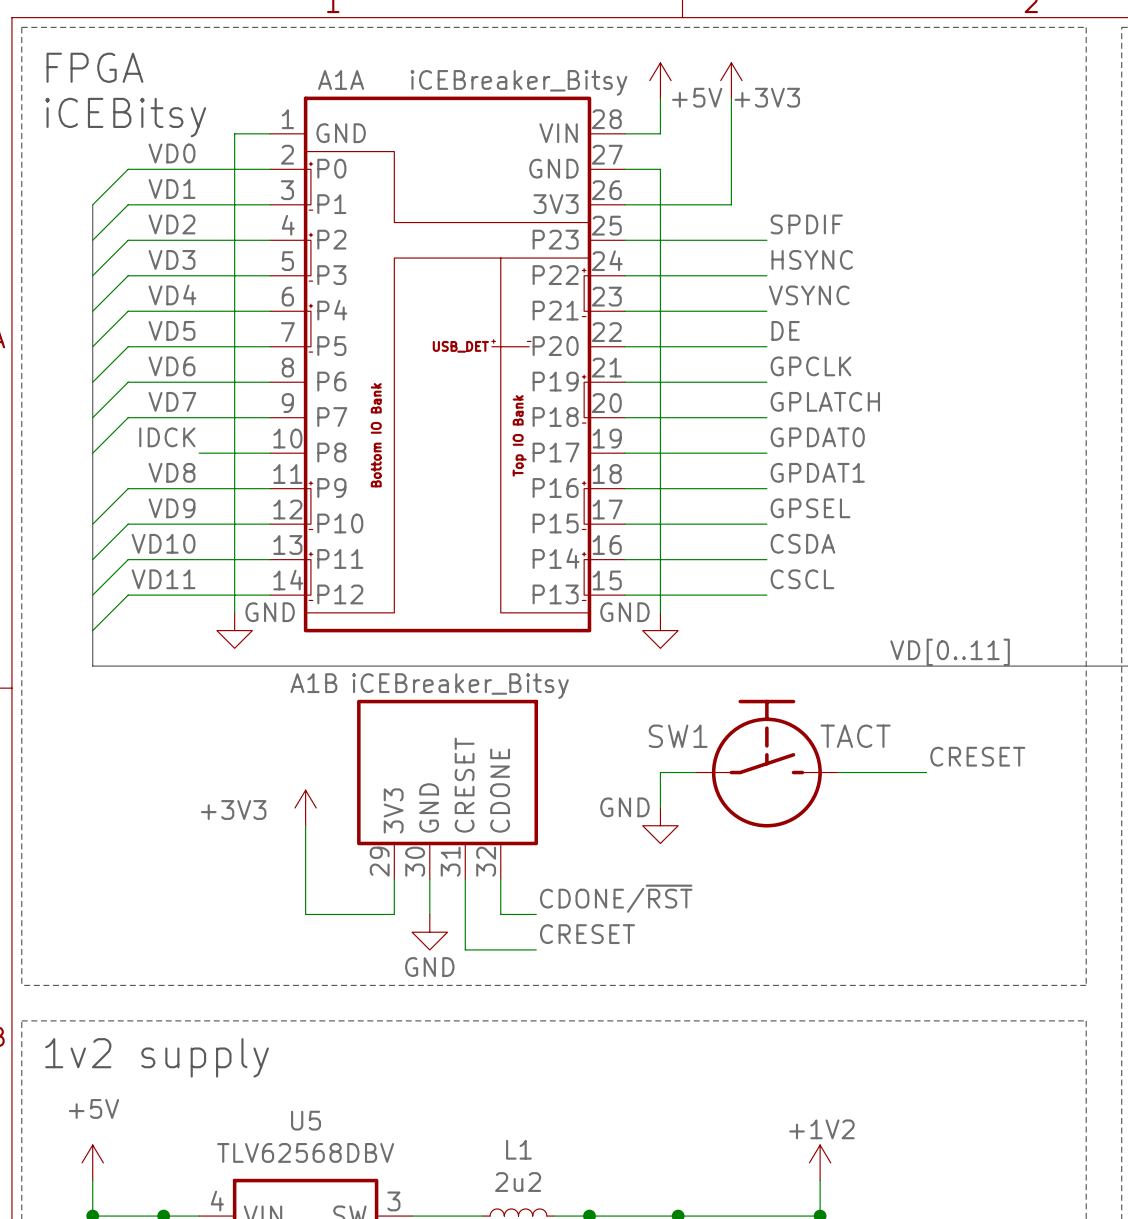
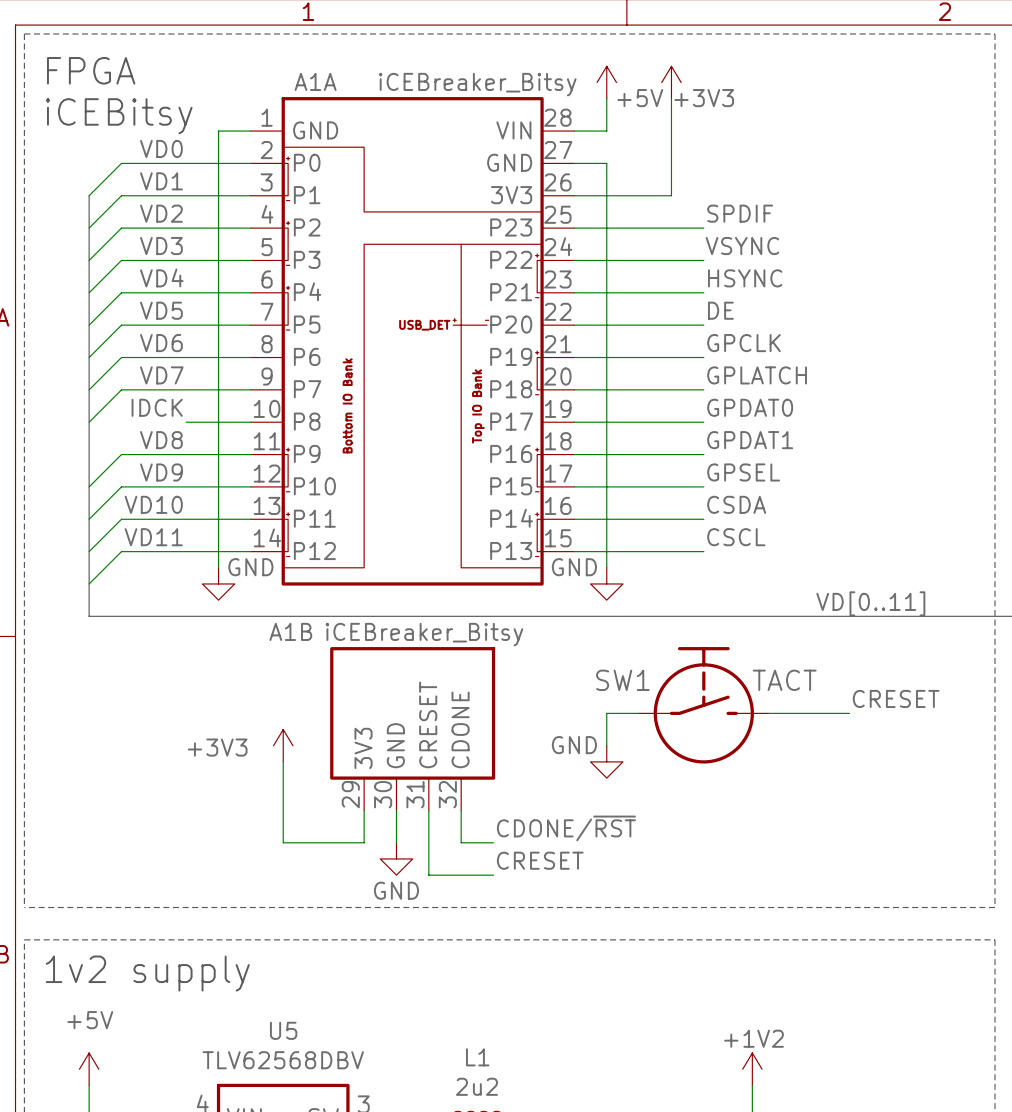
label: HSYNC (812, 259) -> VSYNC (742, 246)
label: VSYNC (809, 295) -> HSYNC (745, 278)

